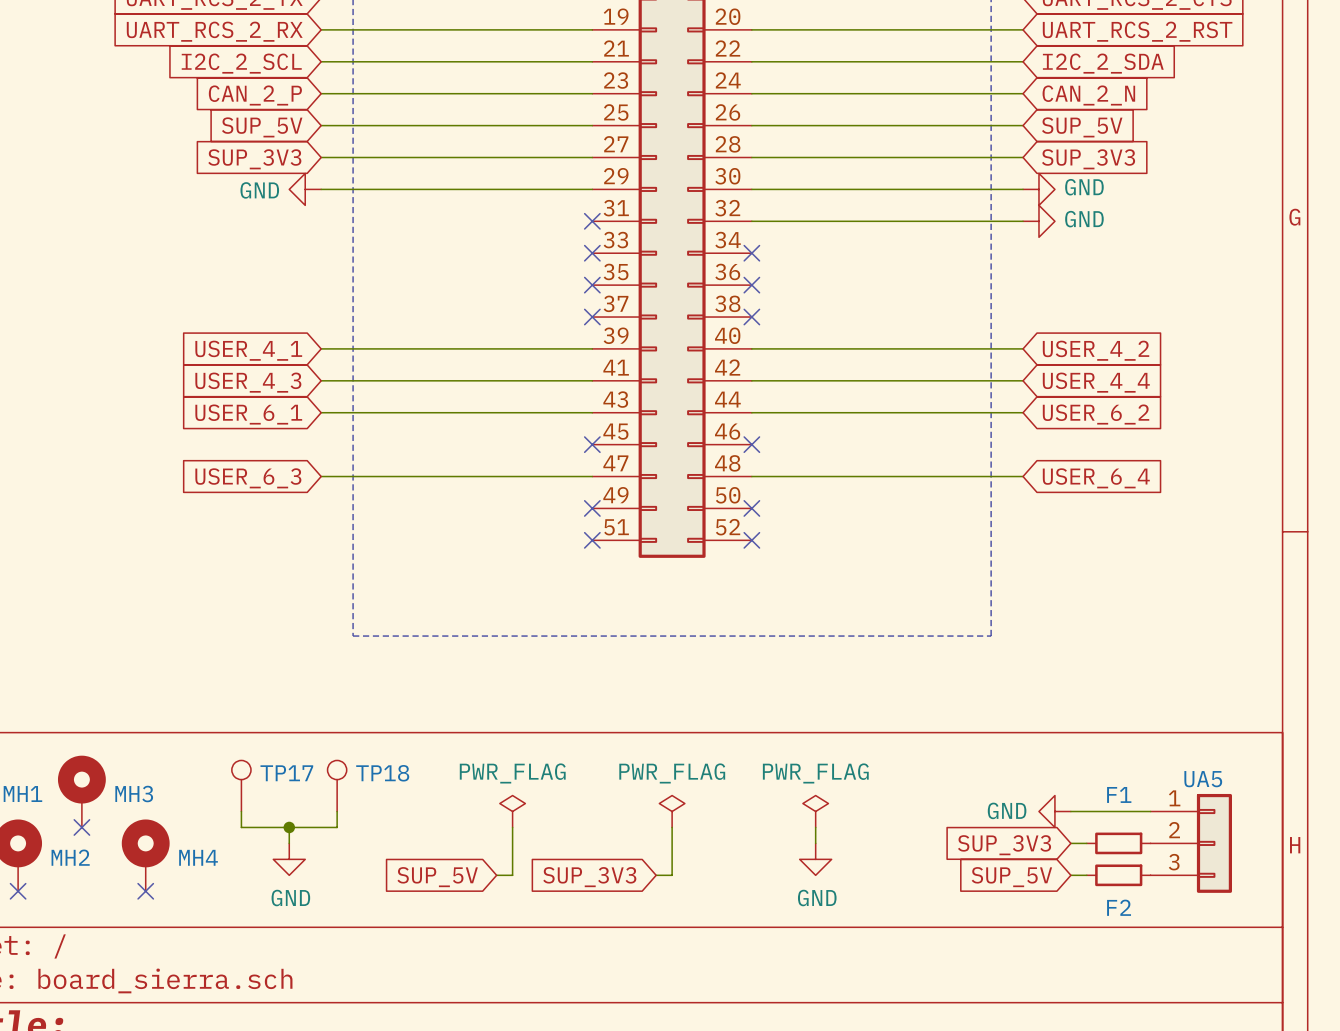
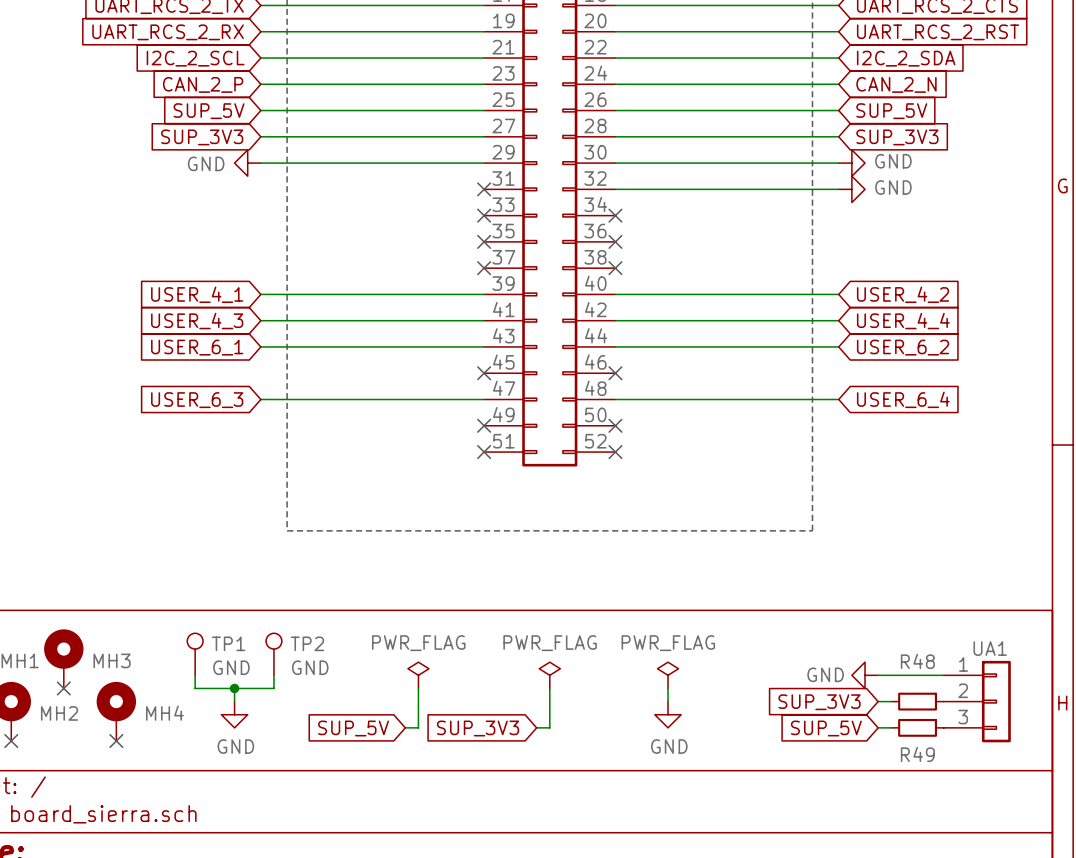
TP17 name: TP17 (286, 773) -> TP1 (228, 643)
TP18 name: TP18 (382, 773) -> TP2 (307, 643)
UA5 name: UA5 (1203, 779) -> UA1 (990, 648)
F1 name: F1 (1119, 794) -> R48 (917, 661)
TP17 value: none -> GND (231, 667)
TP18 value: none -> GND (310, 667)
F2 name: F2 (1119, 907) -> R49 (917, 754)

